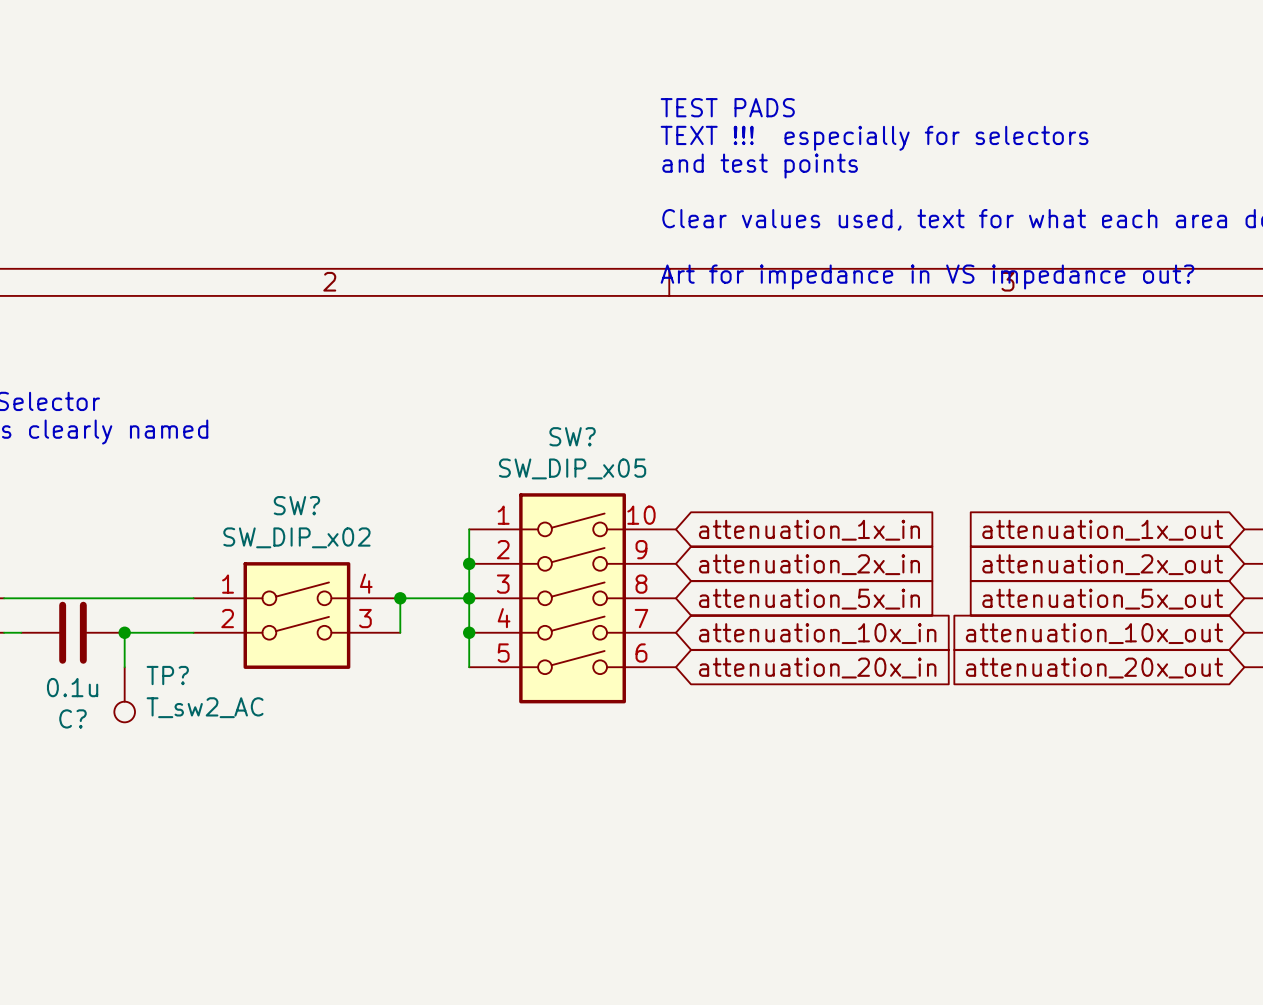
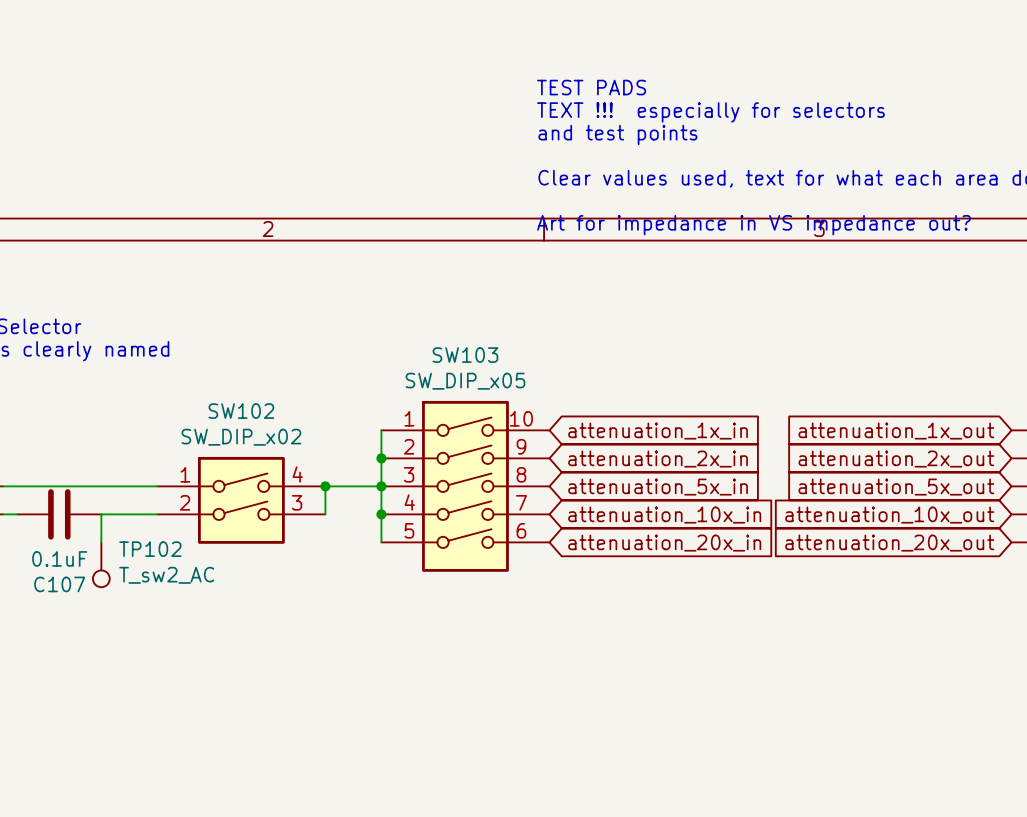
SW? name: SW? (572, 436) -> SW103 (465, 355)
SW? name: SW? (296, 505) -> SW102 (241, 411)
junction: (124, 632) -> none
TP? name: TP? (167, 675) -> TP102 (150, 549)
C? value: 0.1u (72, 687) -> 0.1uF (59, 558)
C? name: C? (72, 718) -> C107 (59, 584)

